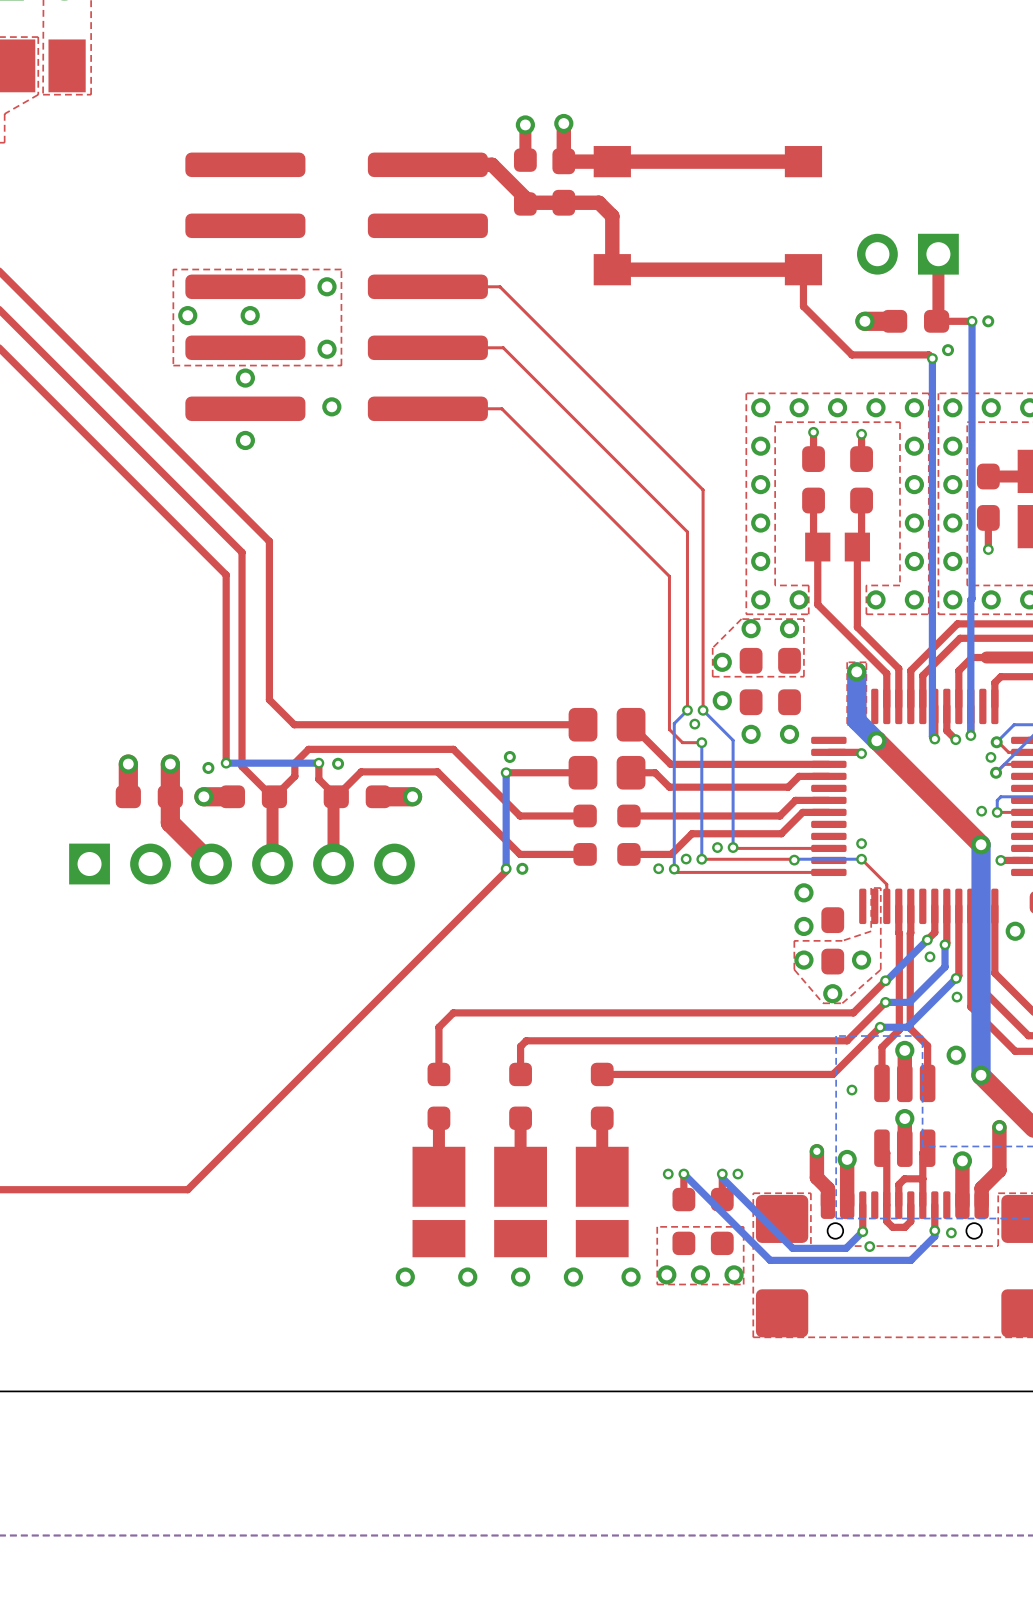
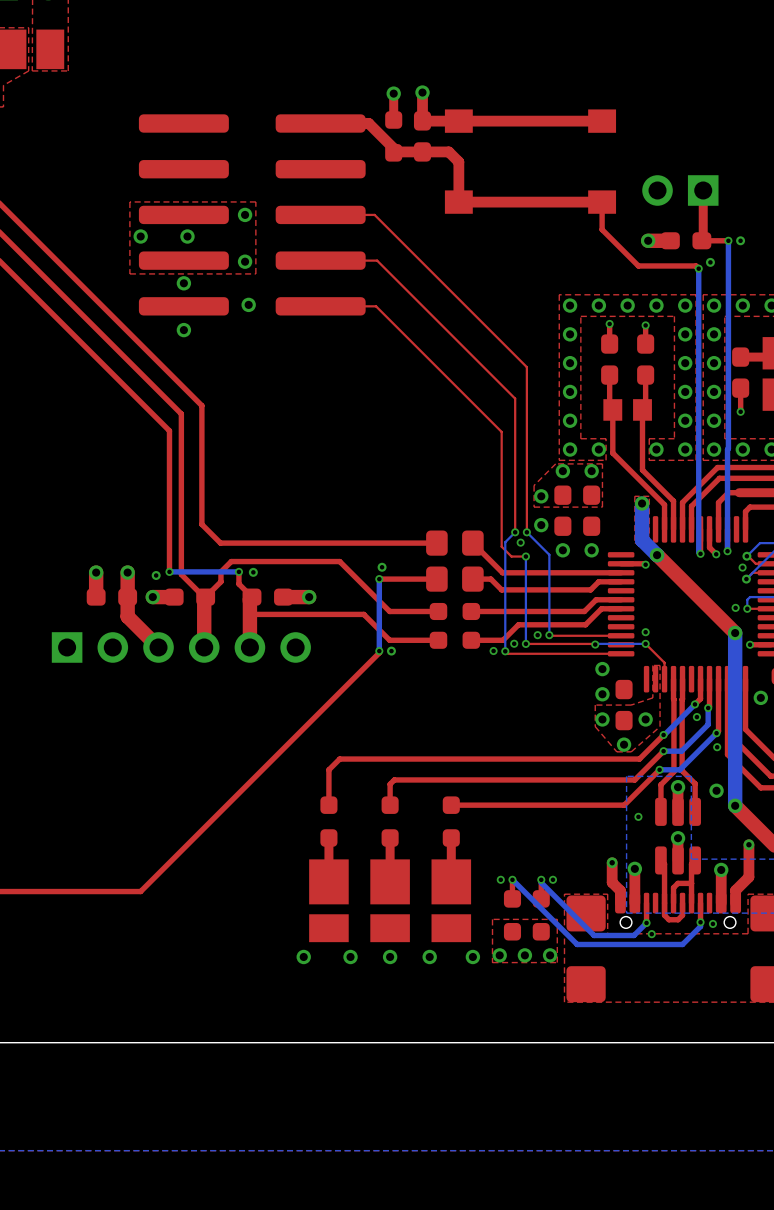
top track width: thin (274, 796) (272, 798) (272, 864) -> thick (205, 597) (204, 647)
top track: (336, 796) (361, 771) (437, 771) (485, 819) -> (249, 614) (363, 614)
top track width: thin (336, 796) (333, 799) (333, 864) -> thick (252, 597) (249, 599) (249, 647)

